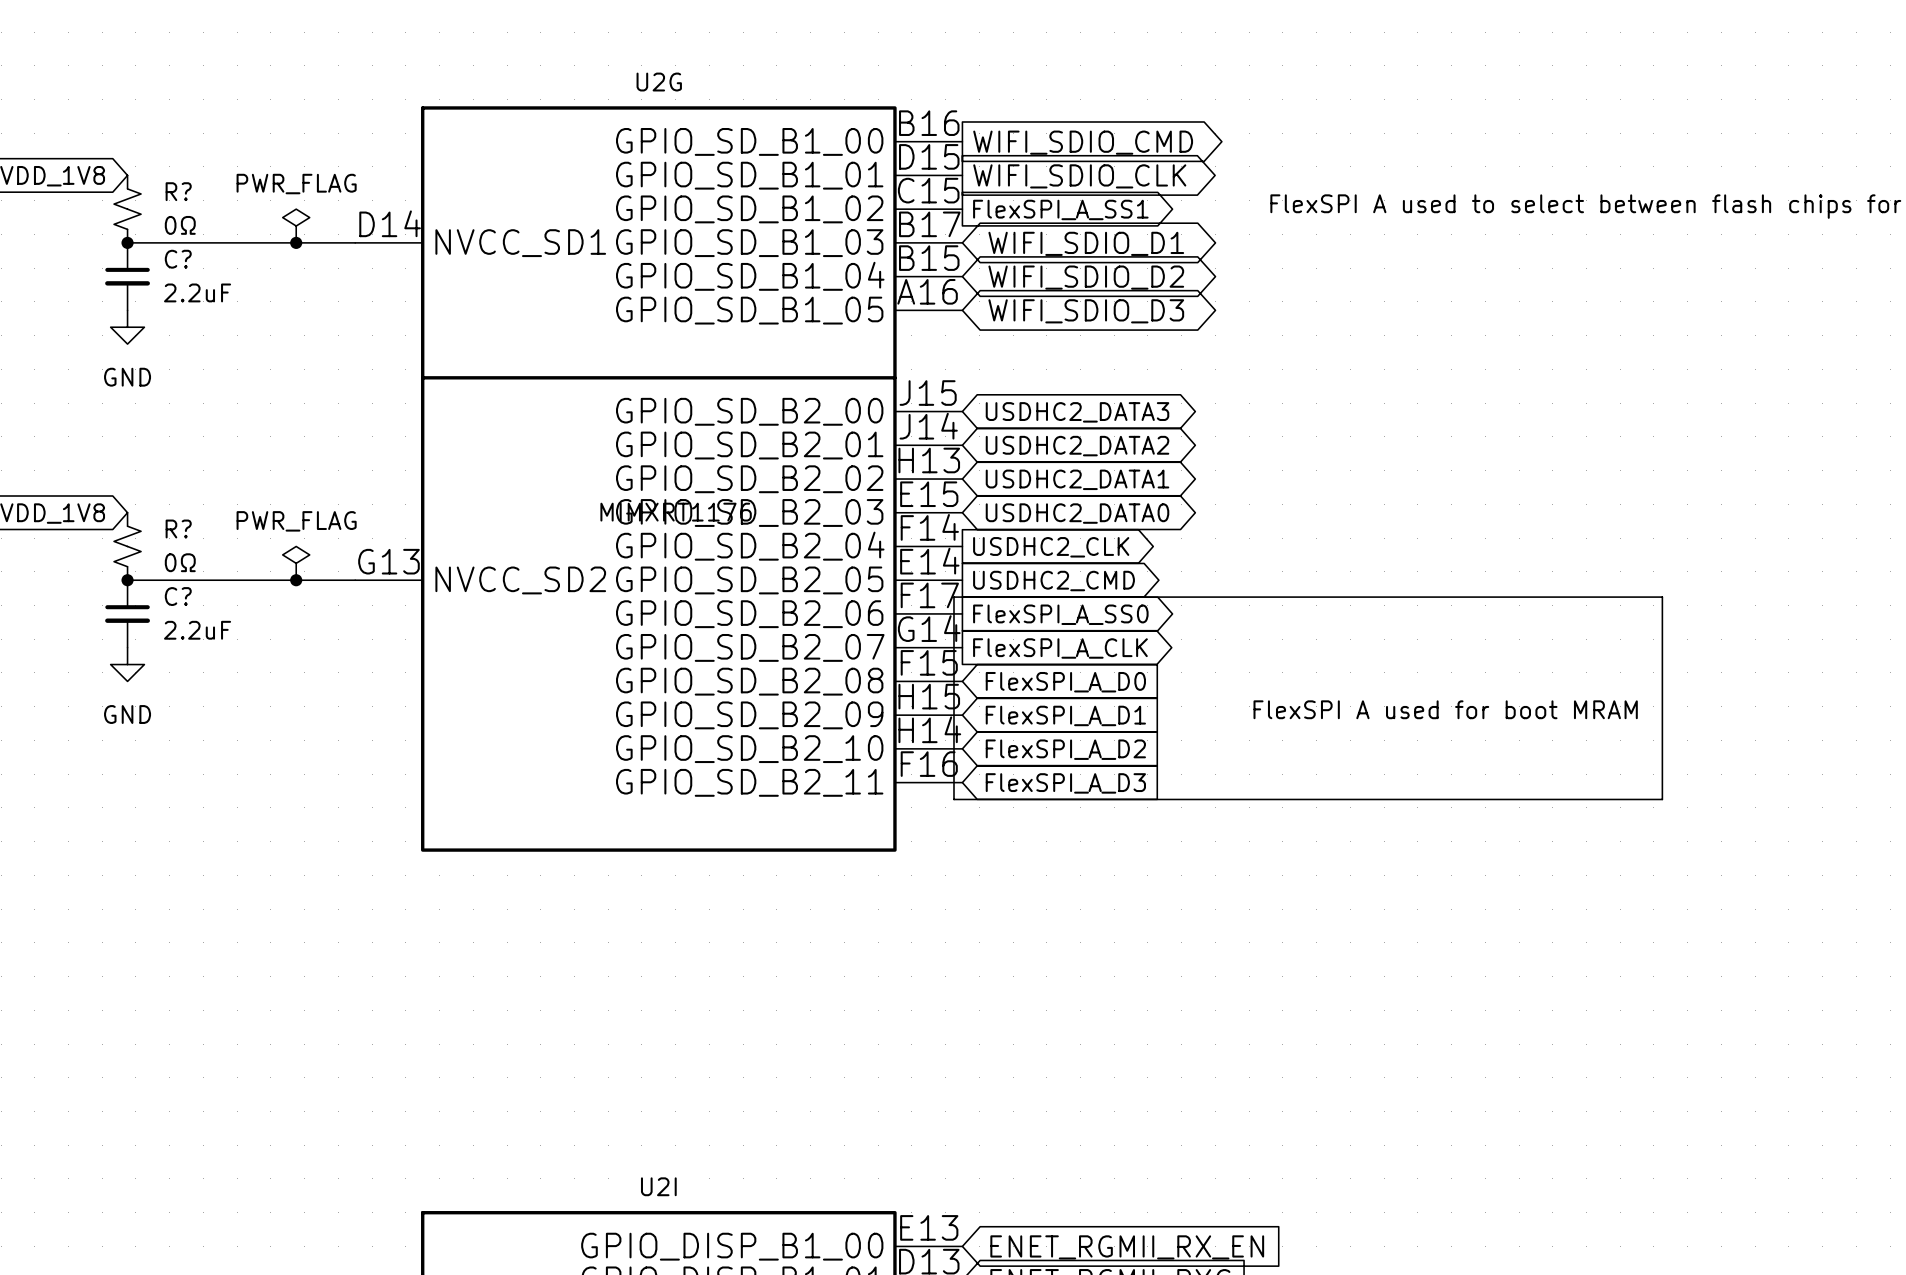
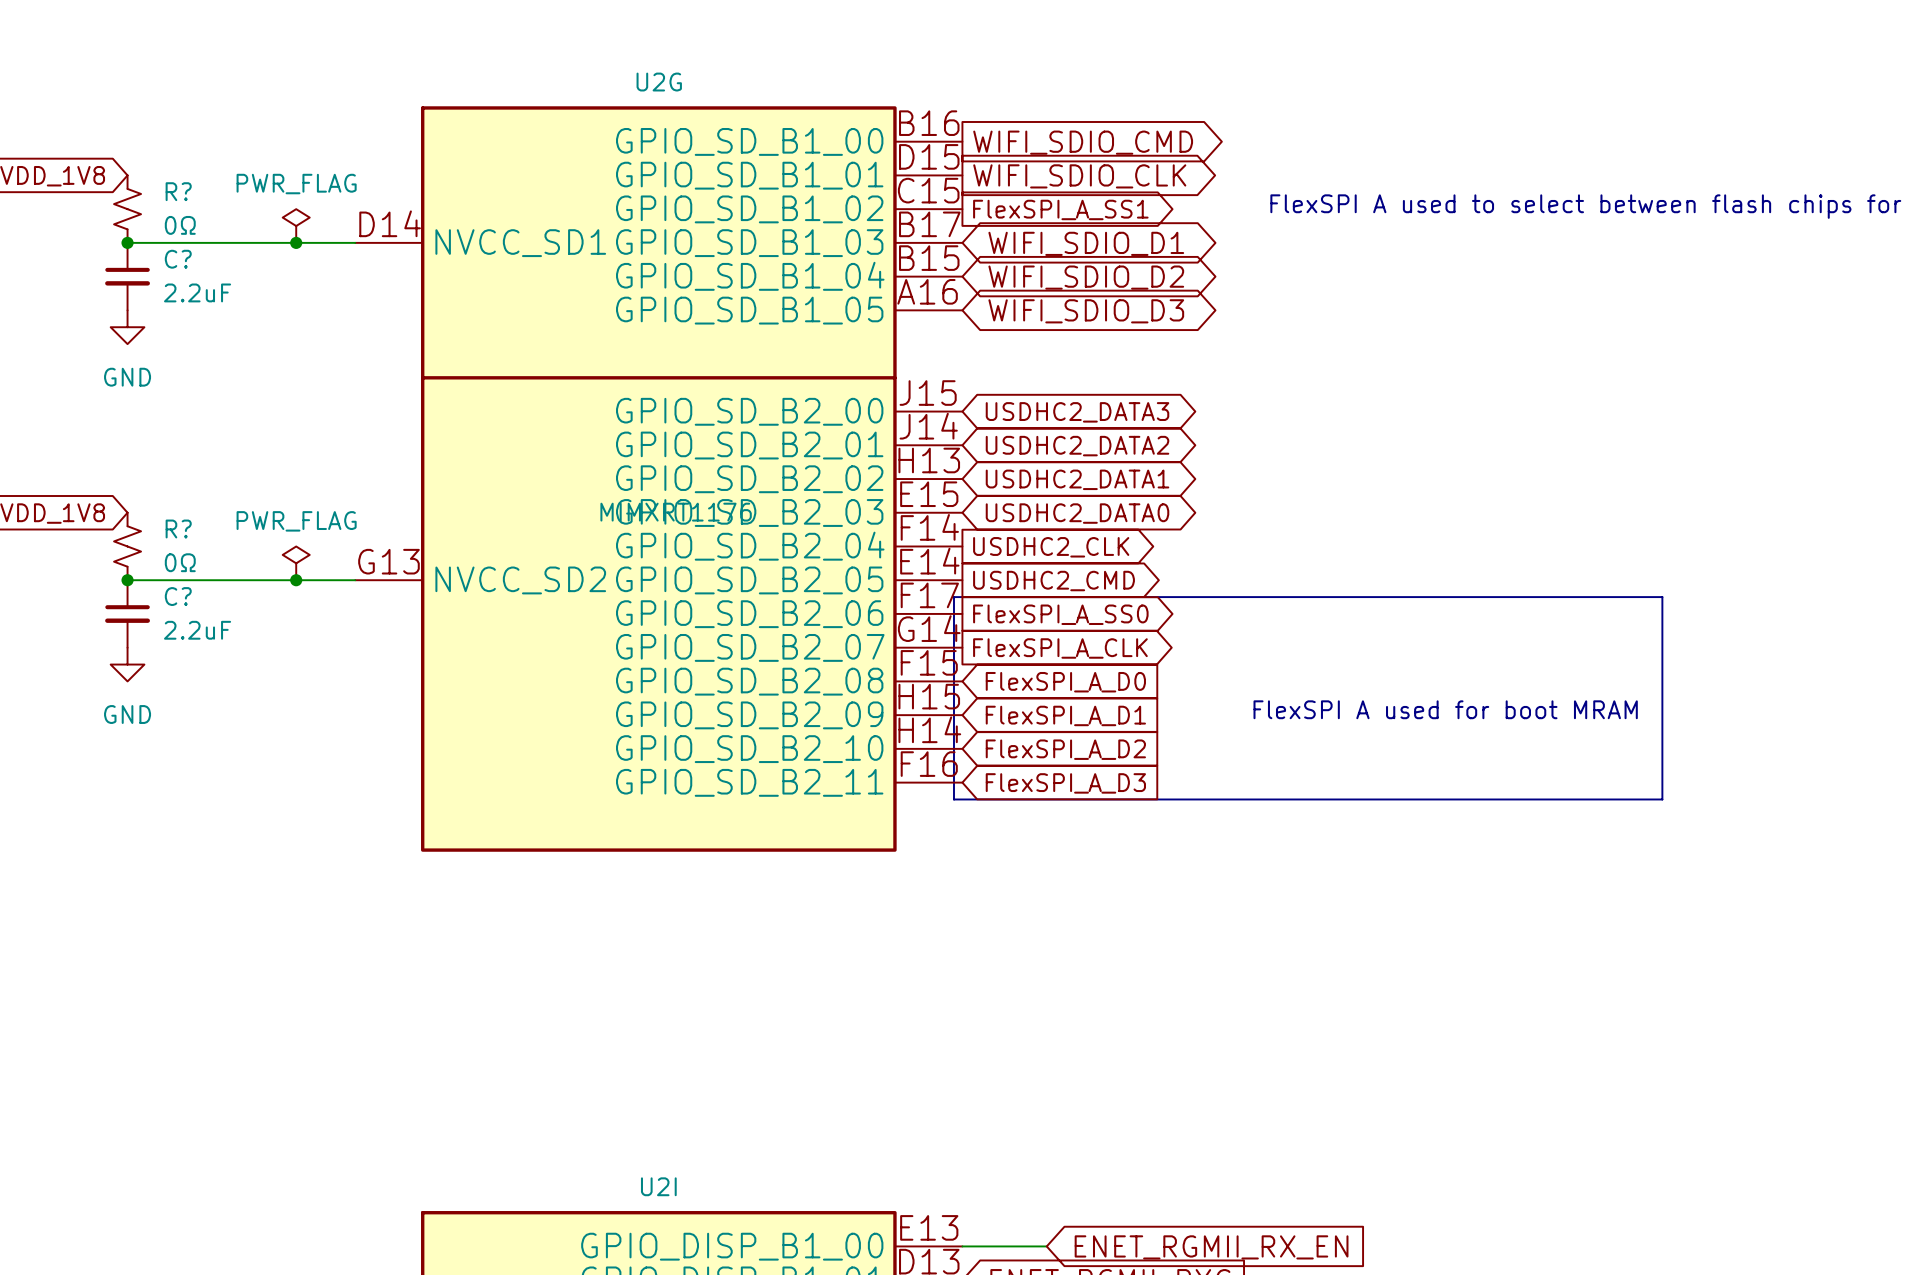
wire: none -> (962, 1246) (1046, 1246)
global label position: ENET_RGMII_RX_EN (1127, 1247) -> ENET_RGMII_RX_EN (1211, 1247)

